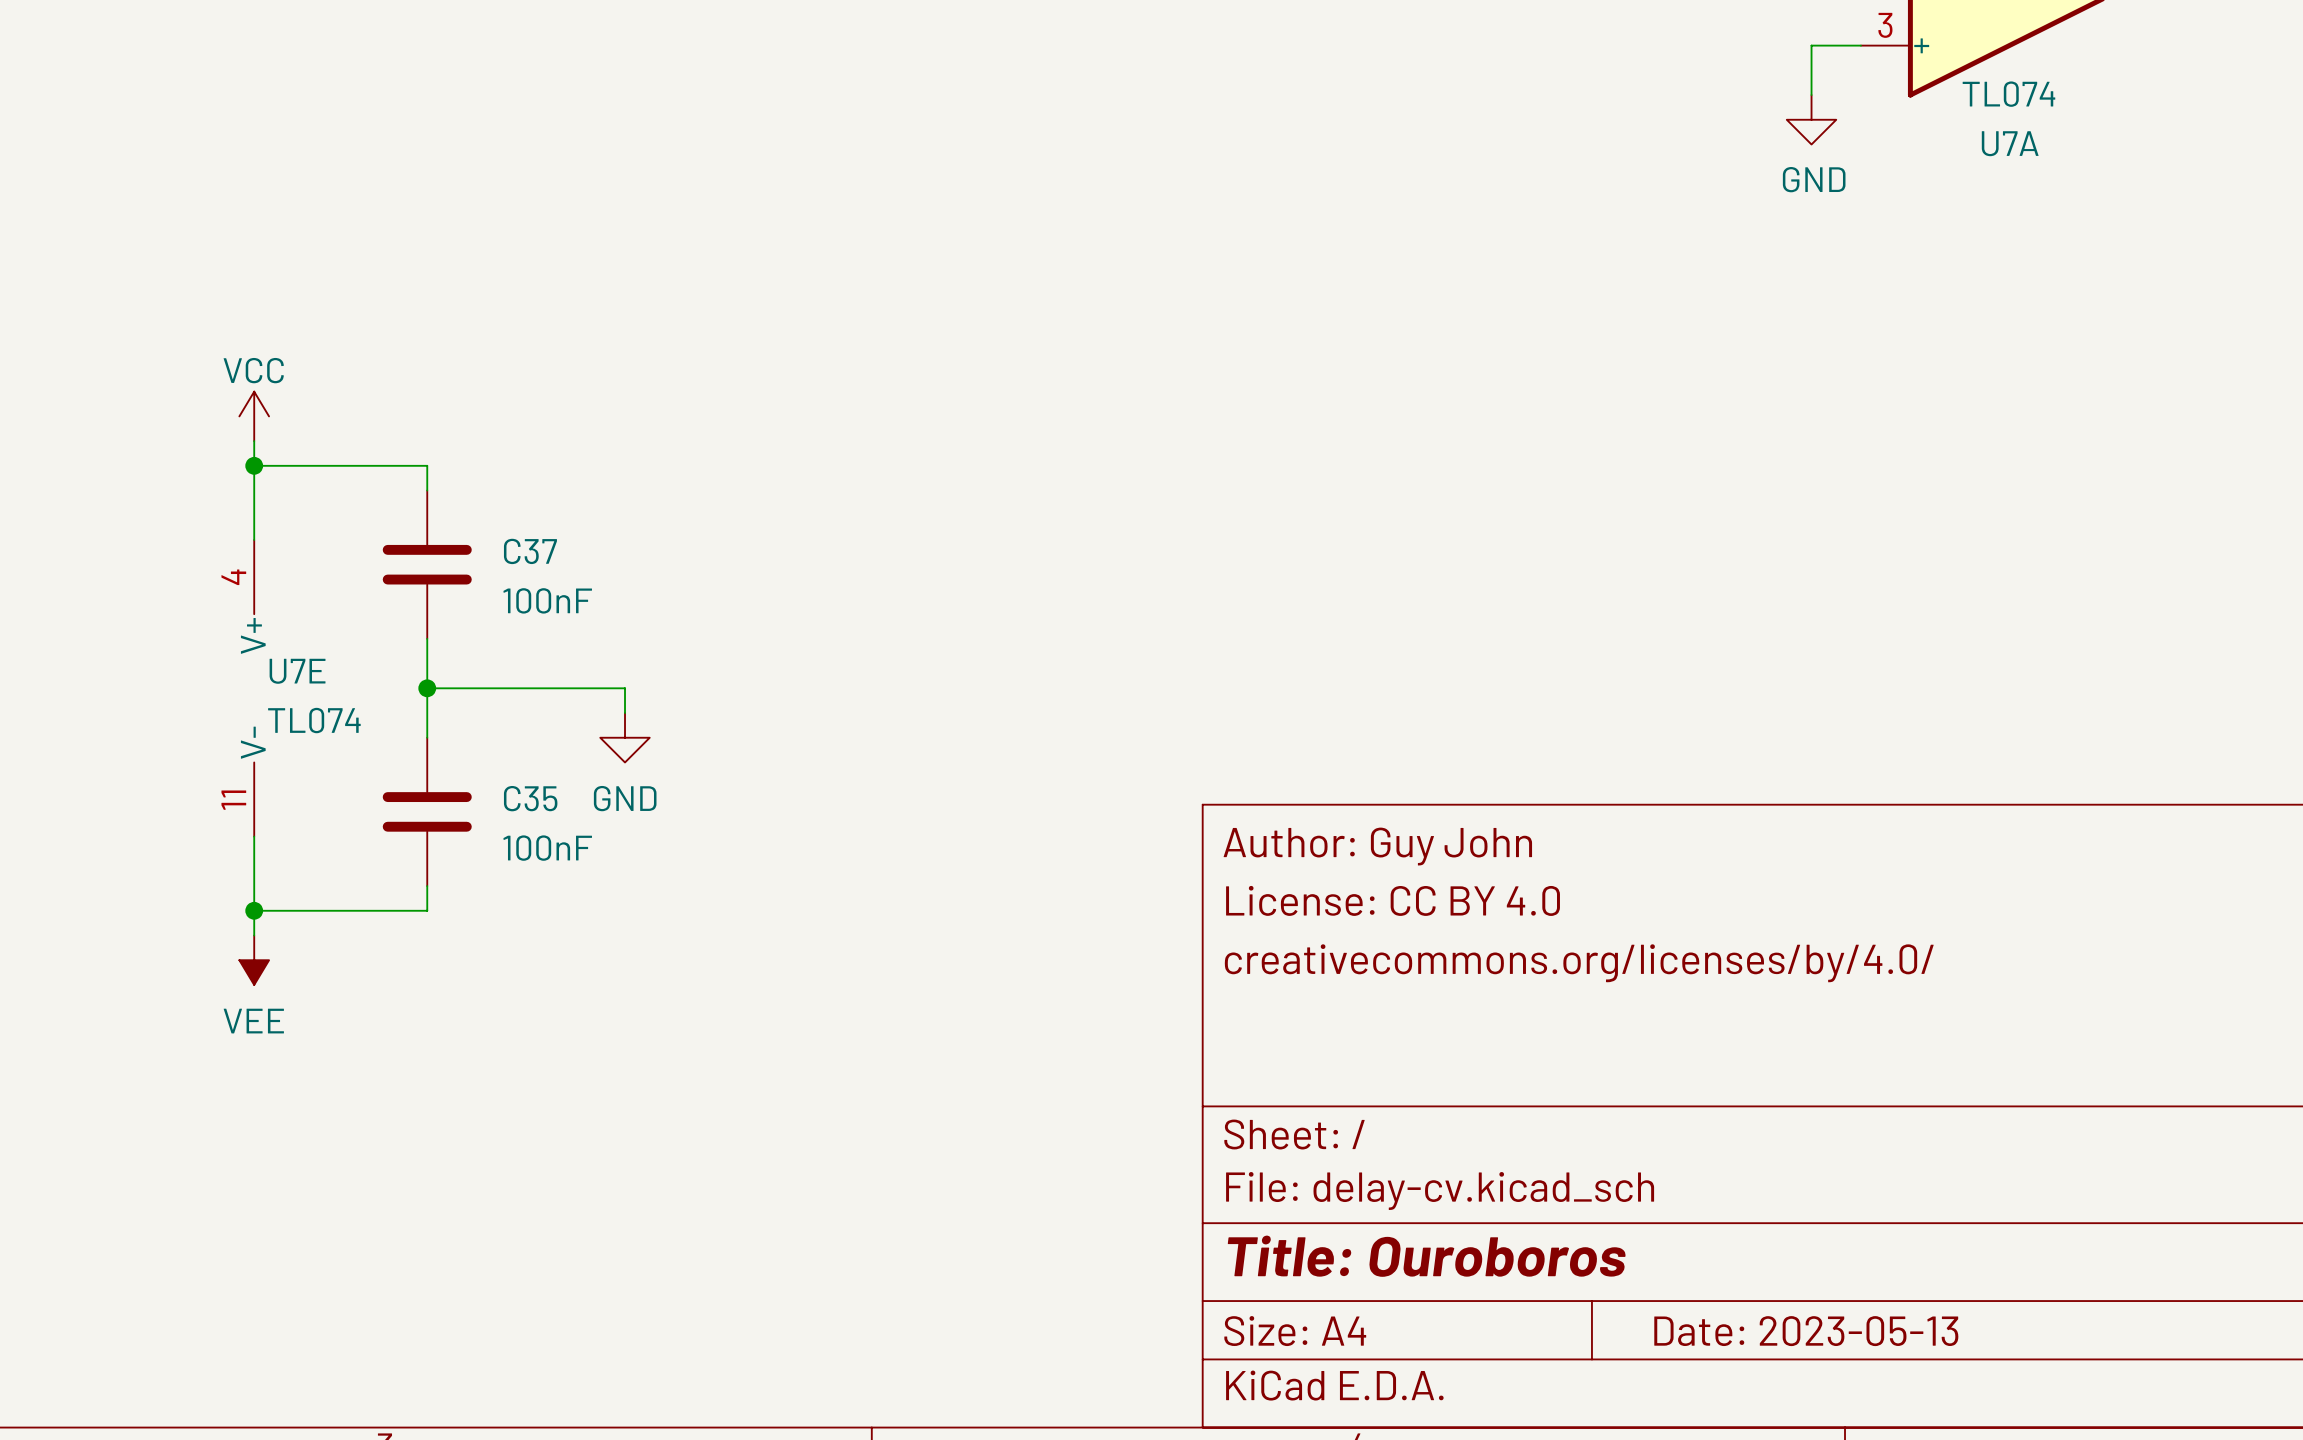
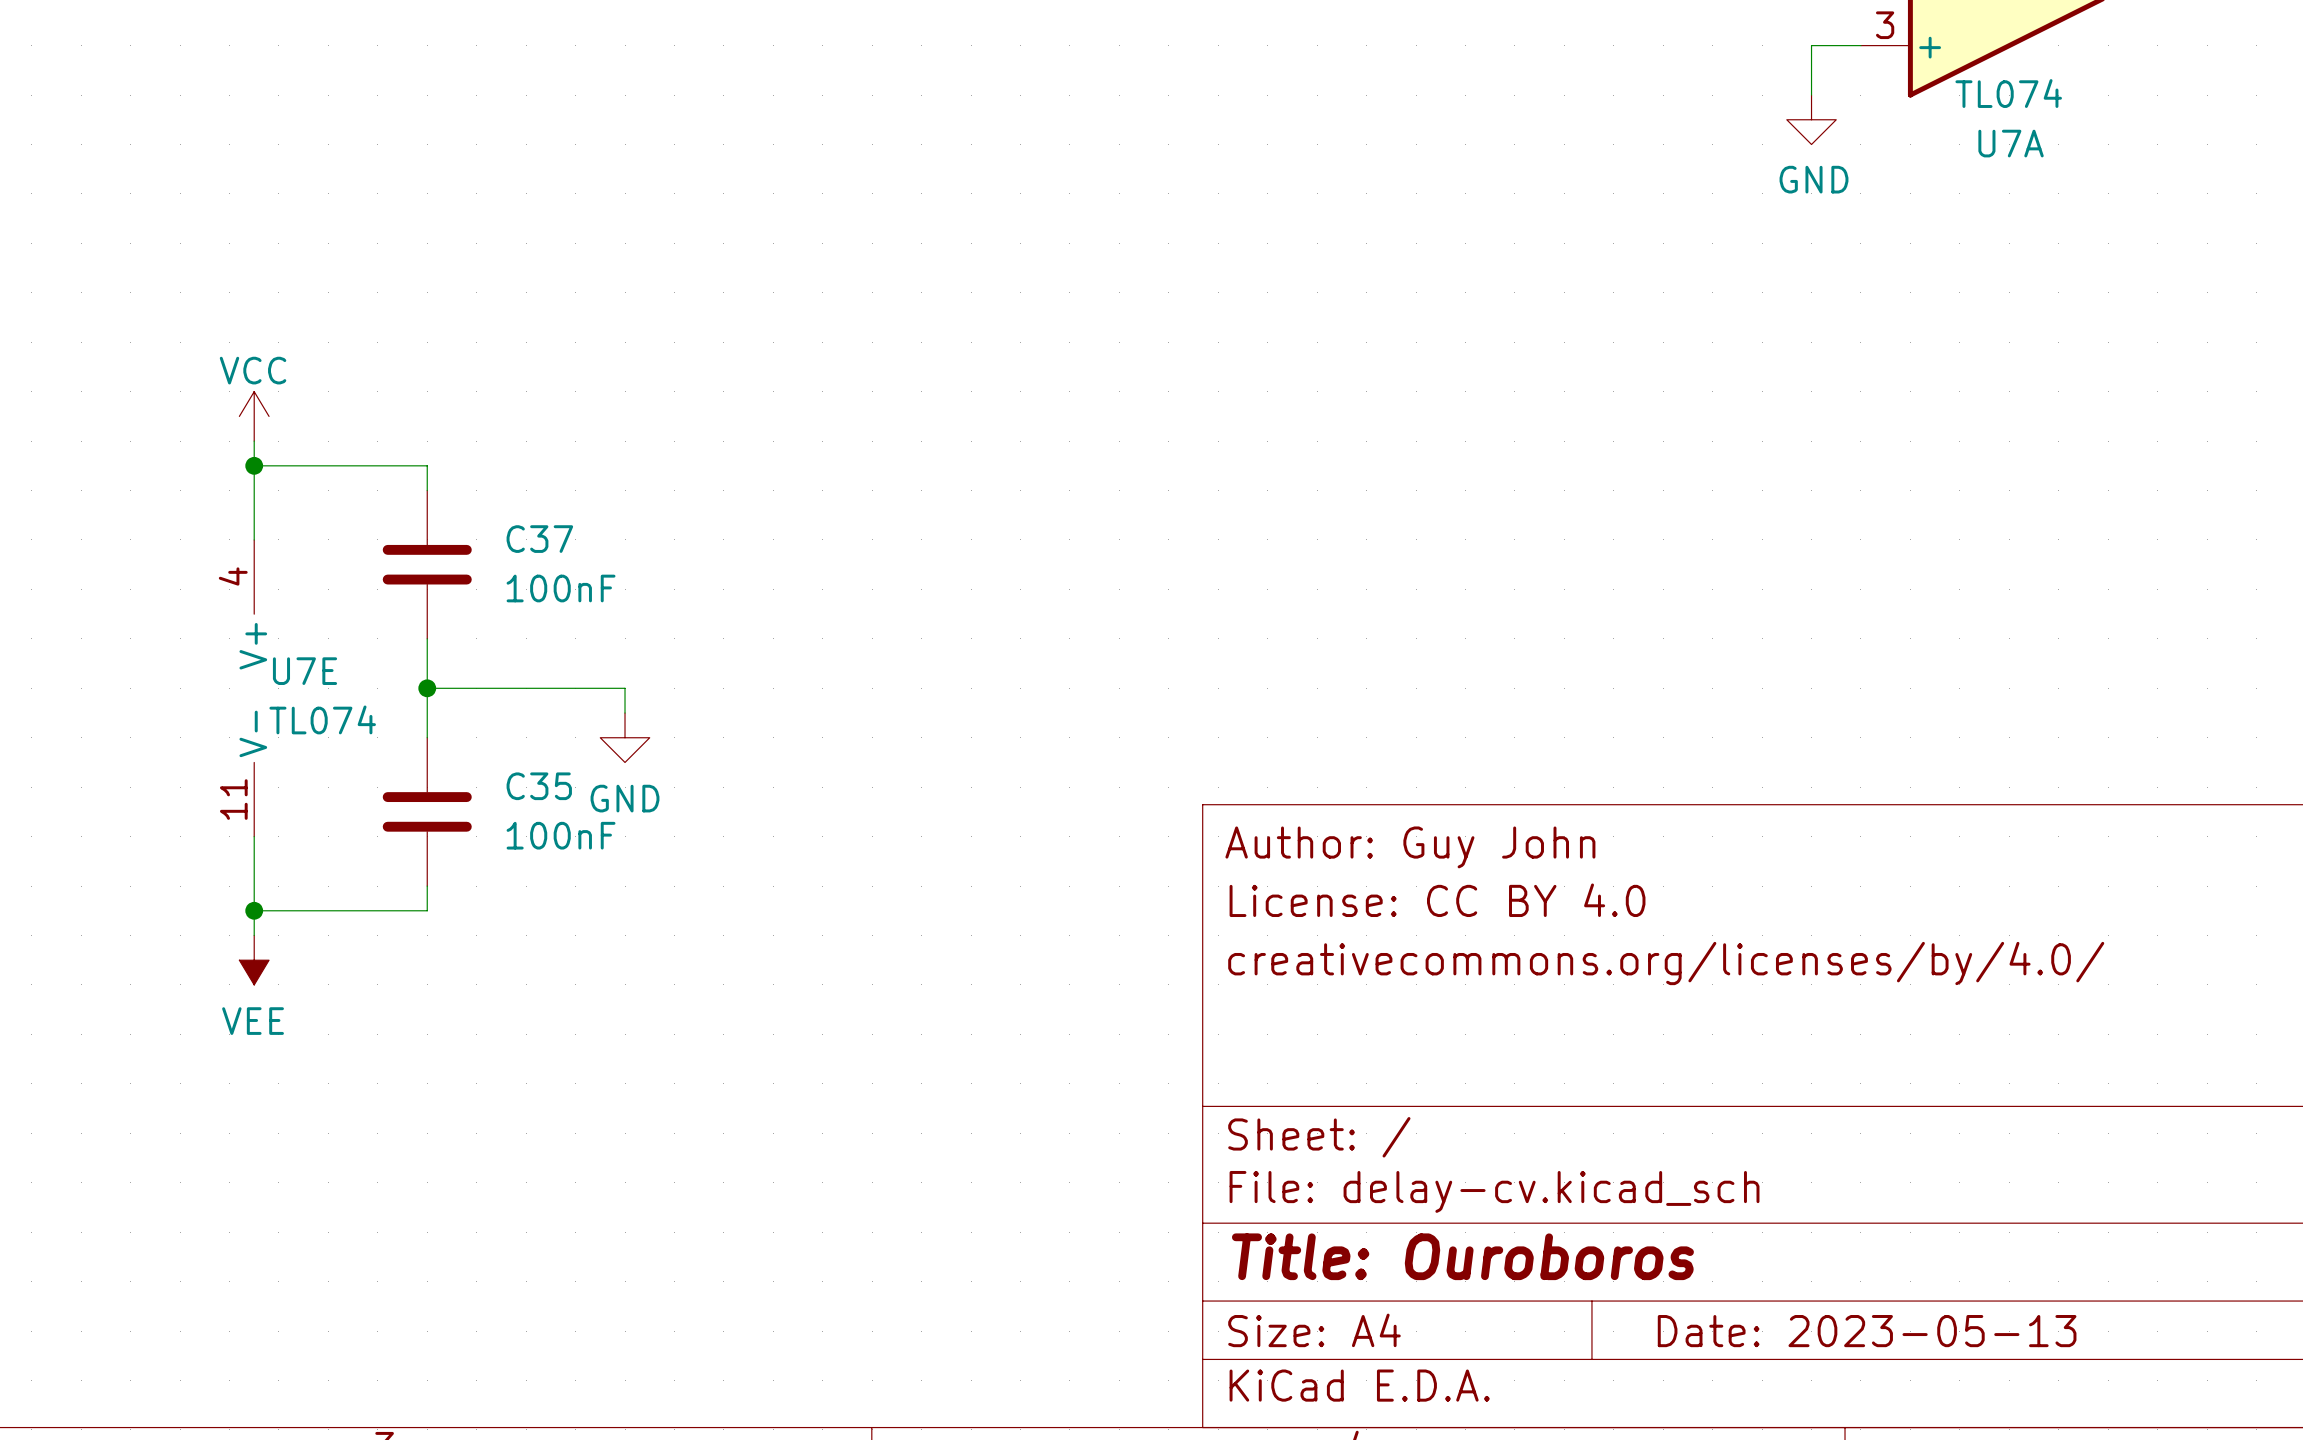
C37 name position: C37 (530, 551) -> C37 (539, 539)
C37 value position: 100nF (547, 600) -> 100nF (561, 588)
C35 name position: C35 (530, 798) -> C35 (539, 786)
C35 value position: 100nF (547, 848) -> 100nF (561, 835)

